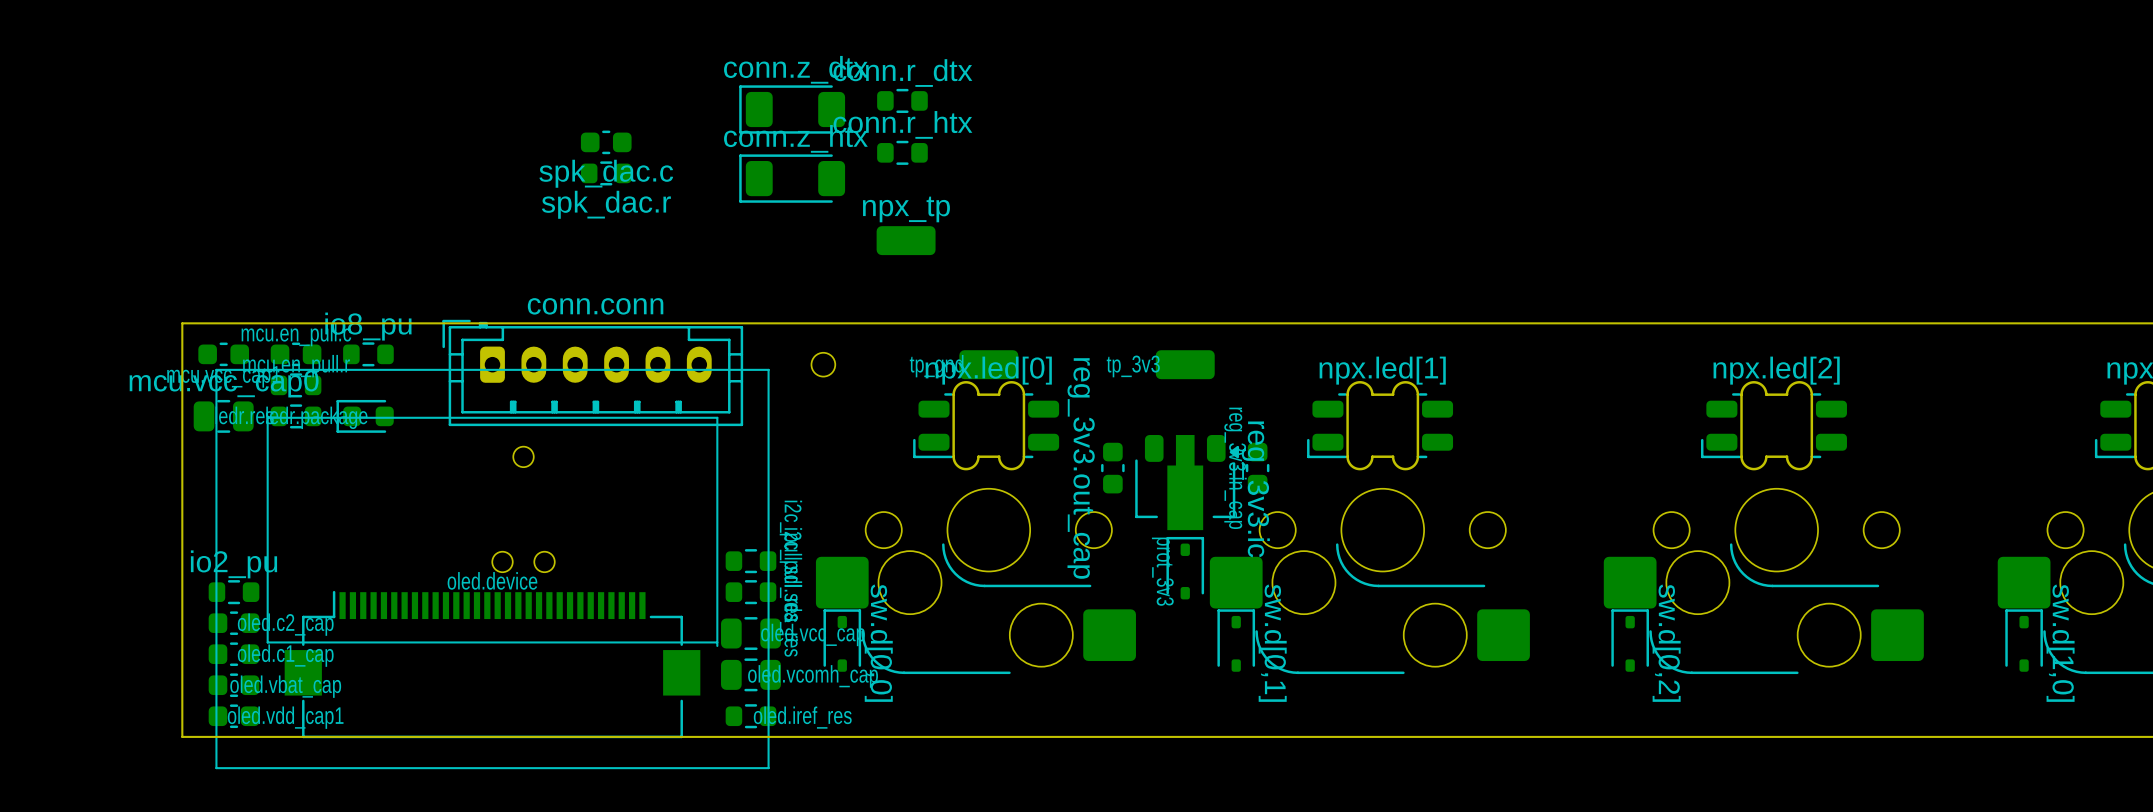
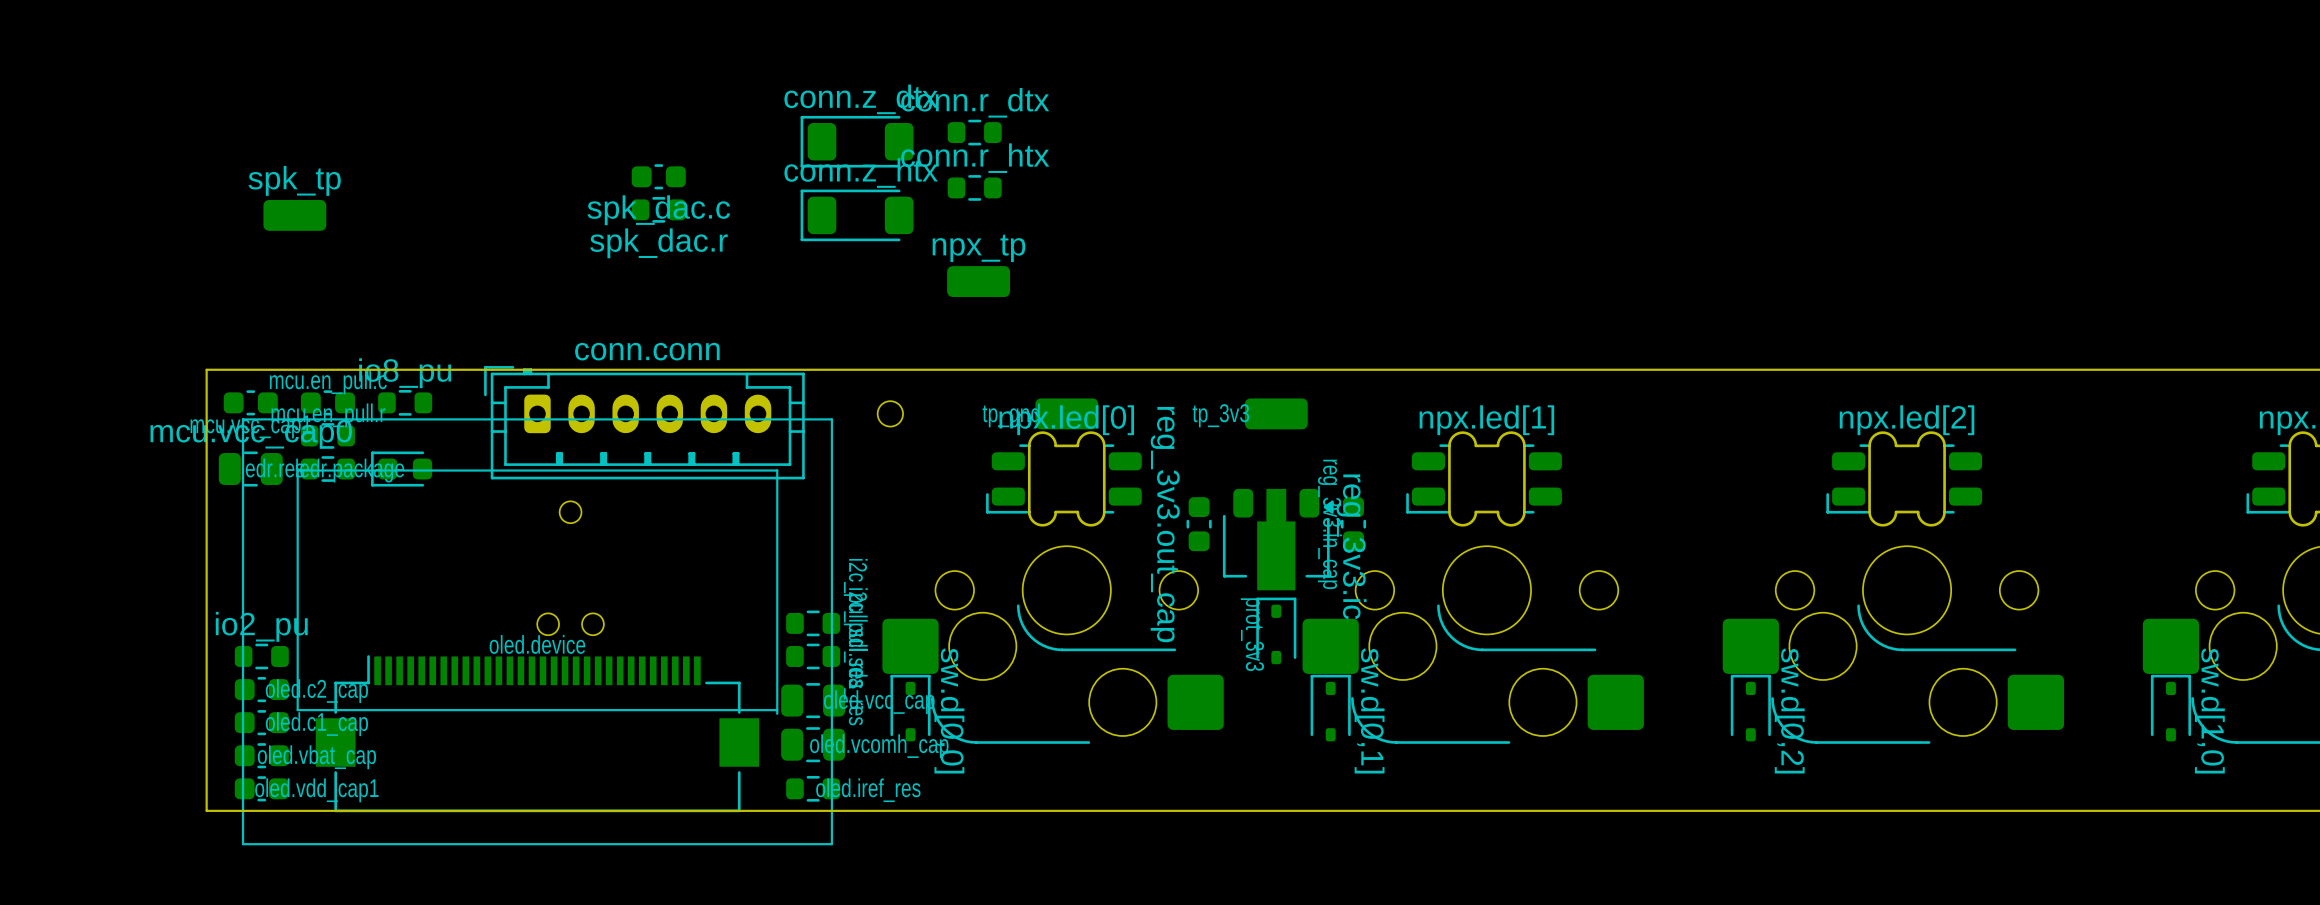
spk_tp: none -> (294, 215)

